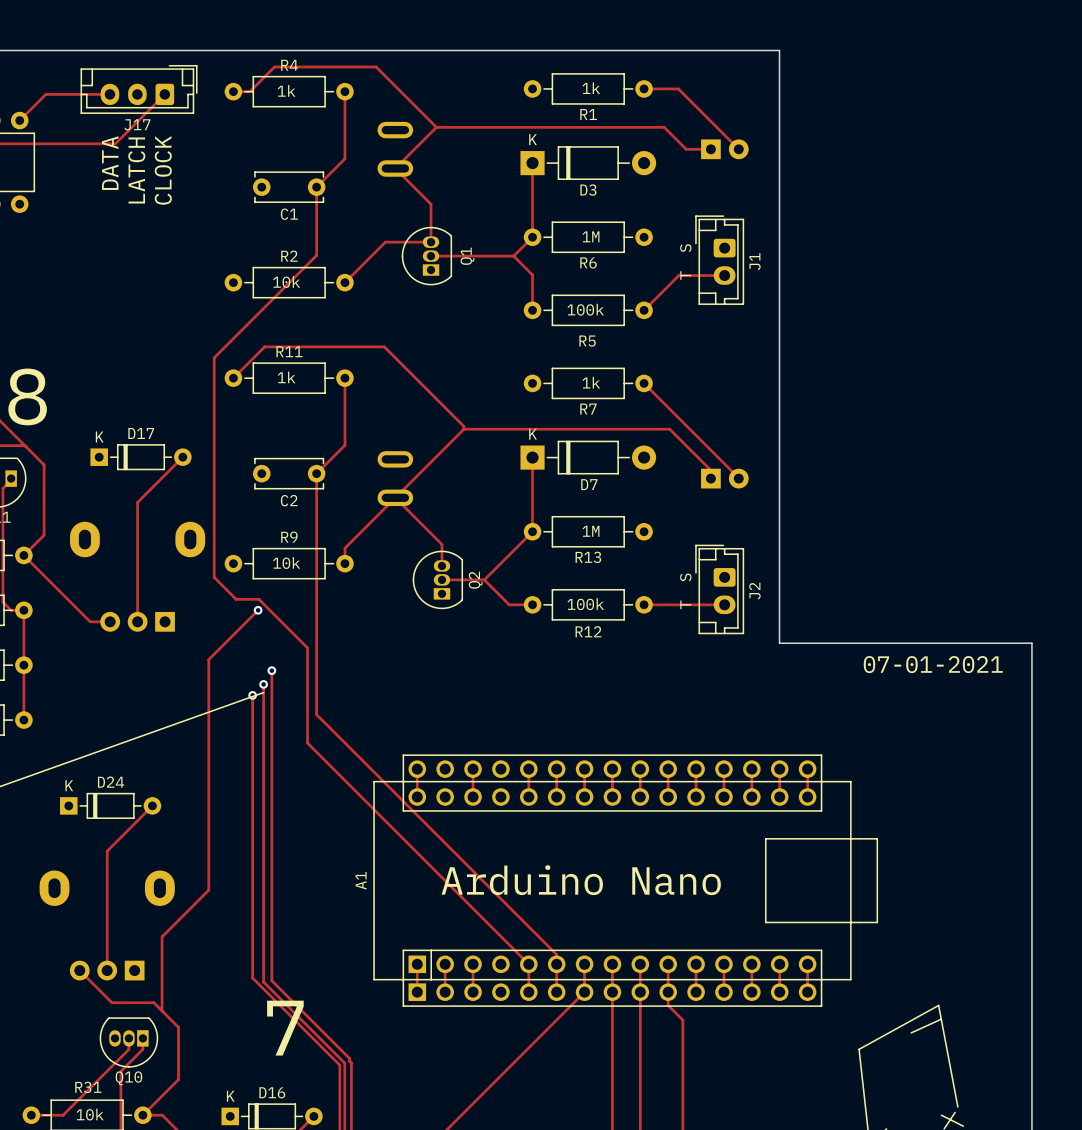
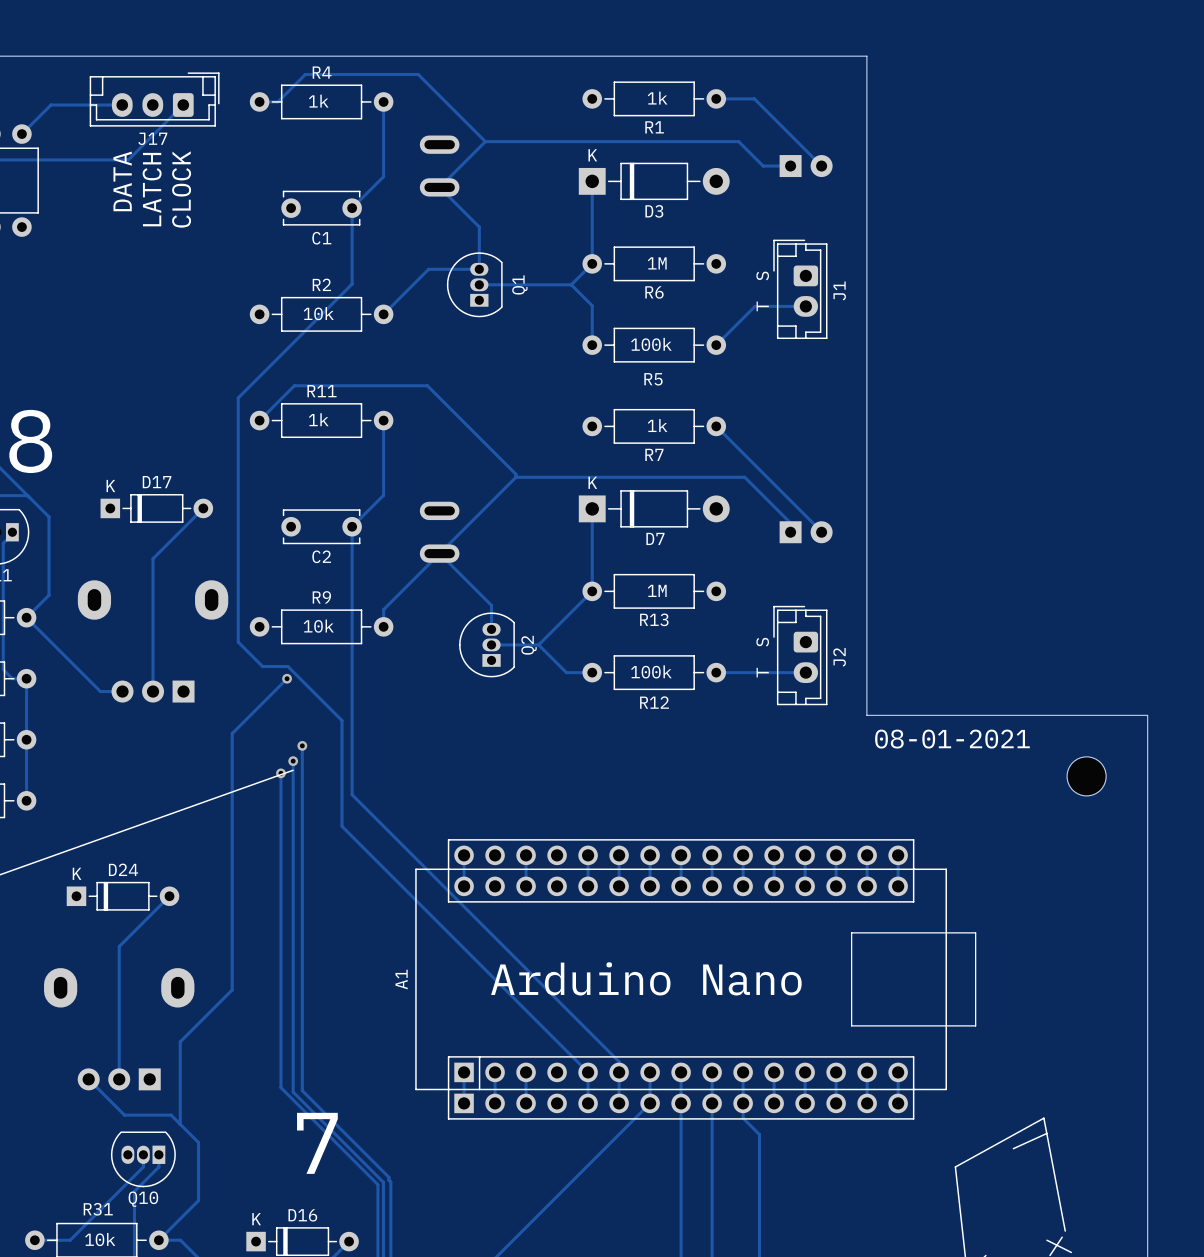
text: 07-01-2021 (933, 664) -> 08-01-2021 (952, 739)
part: none -> (1086, 776)

